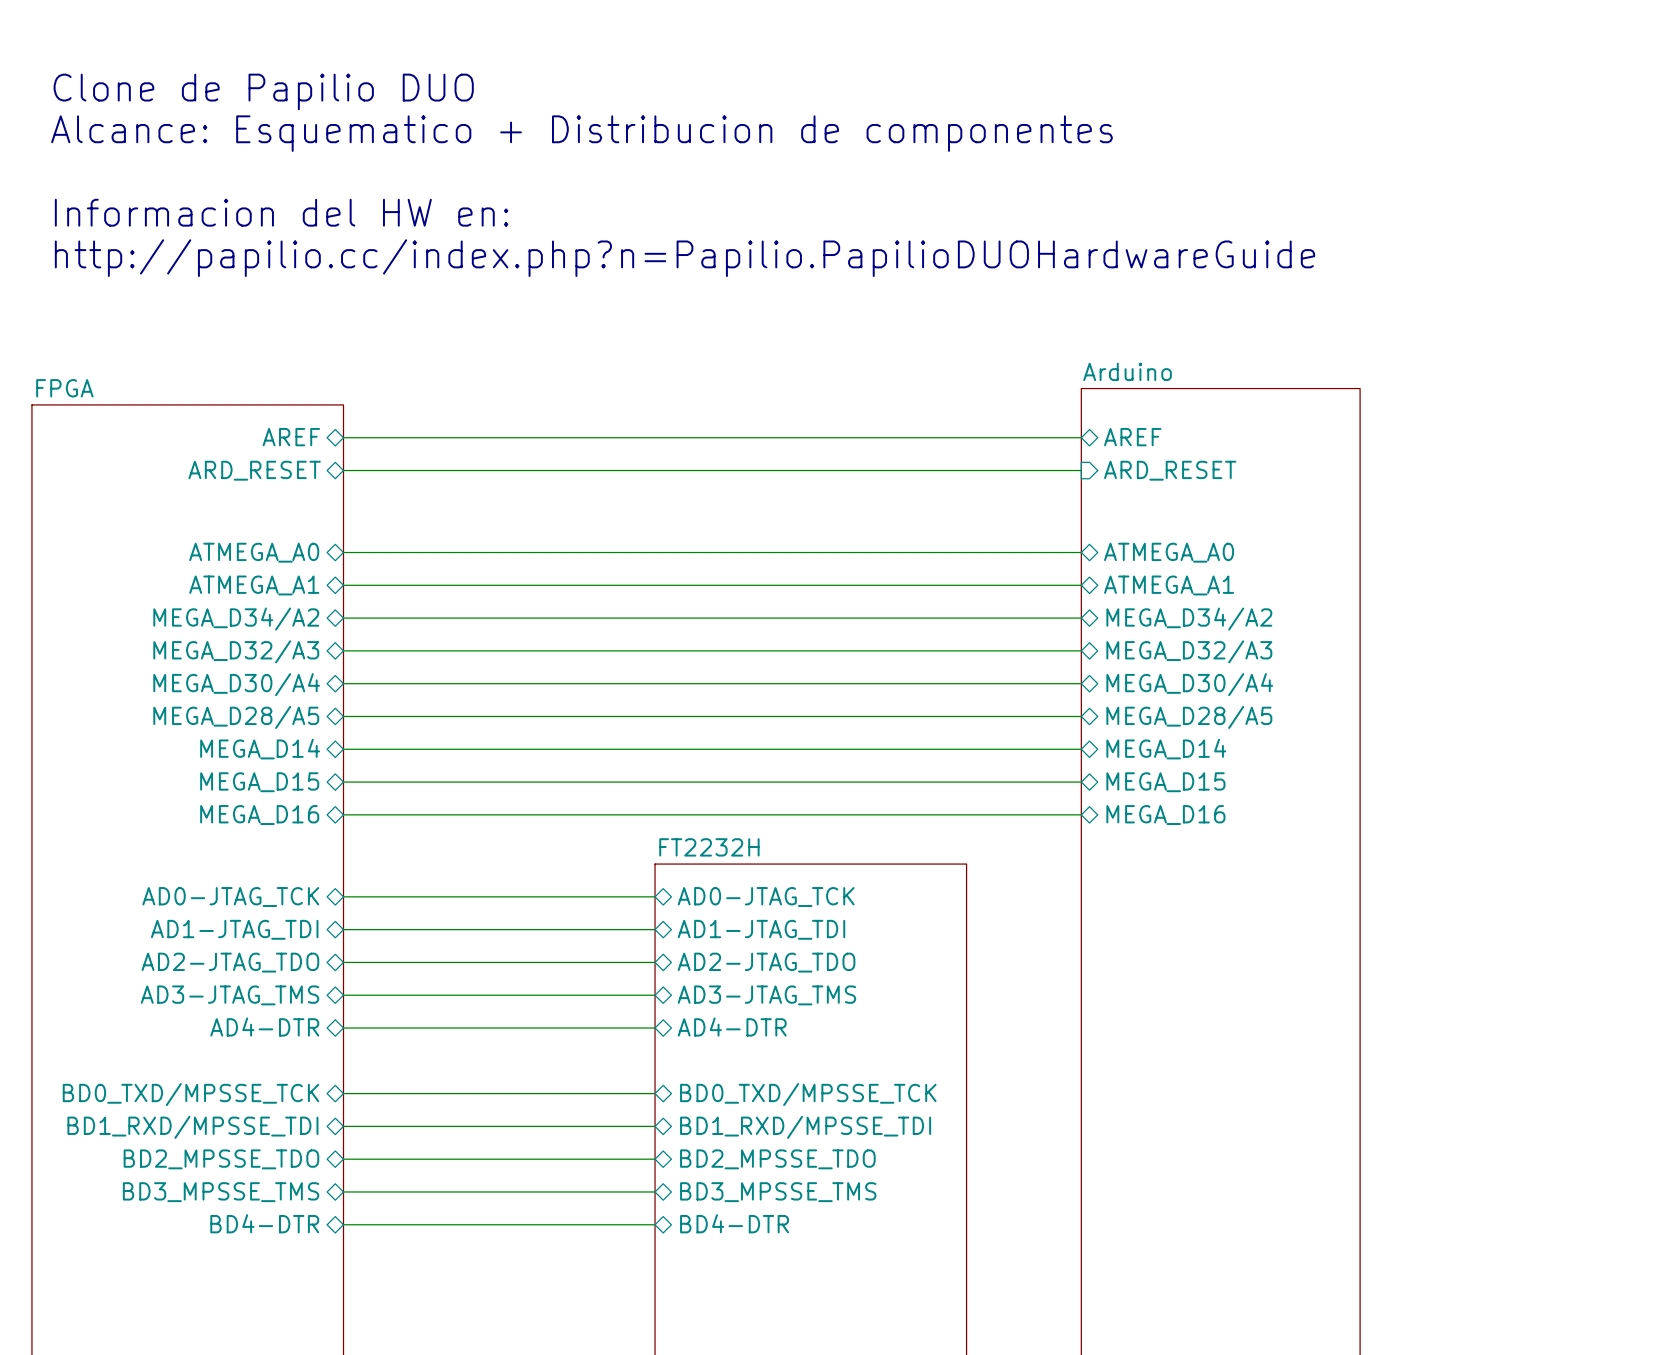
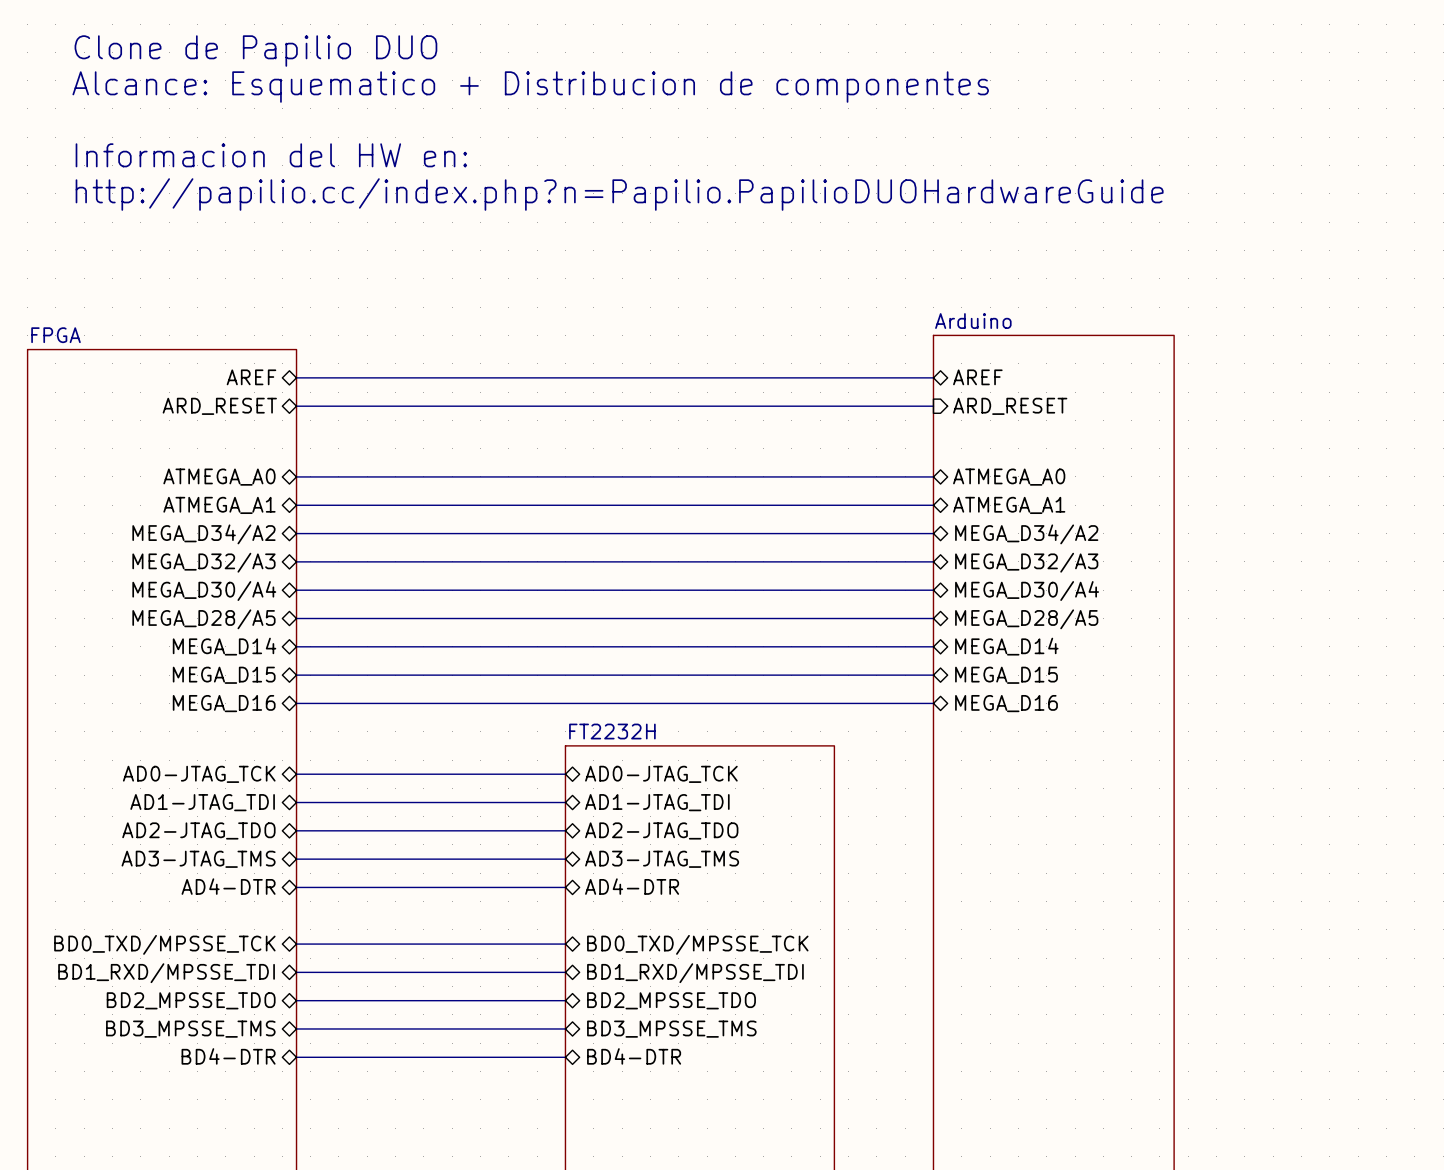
text position: Clone de Papilio DUO (263, 91) -> Clone de Papilio DUO (255, 51)
text position: Alcance: Esquematico + Distribucion de componentes (581, 133) -> Alcance: Esquematico + Distribucion de componentes (530, 87)
text position: Informacion del HW en: (281, 212) -> Informacion del HW en: (271, 155)
text position: http://papilio.cc/index.php?n=Papilio.PapilioDUOHardwareGuide (684, 258) -> http://papilio.cc/index.php?n=Papilio.PapilioDUOHardwareGuide (619, 194)

